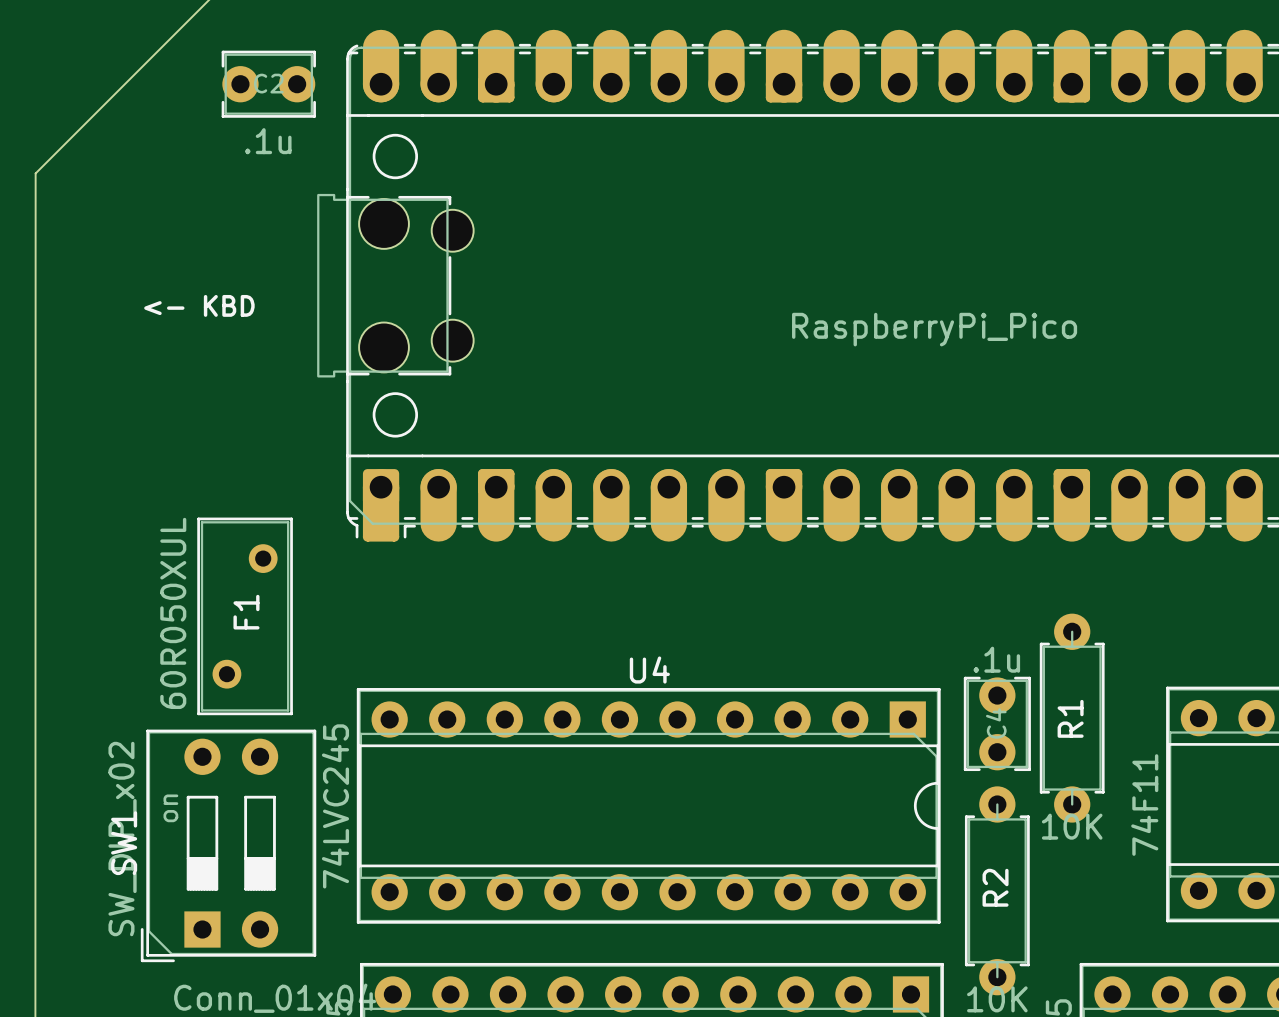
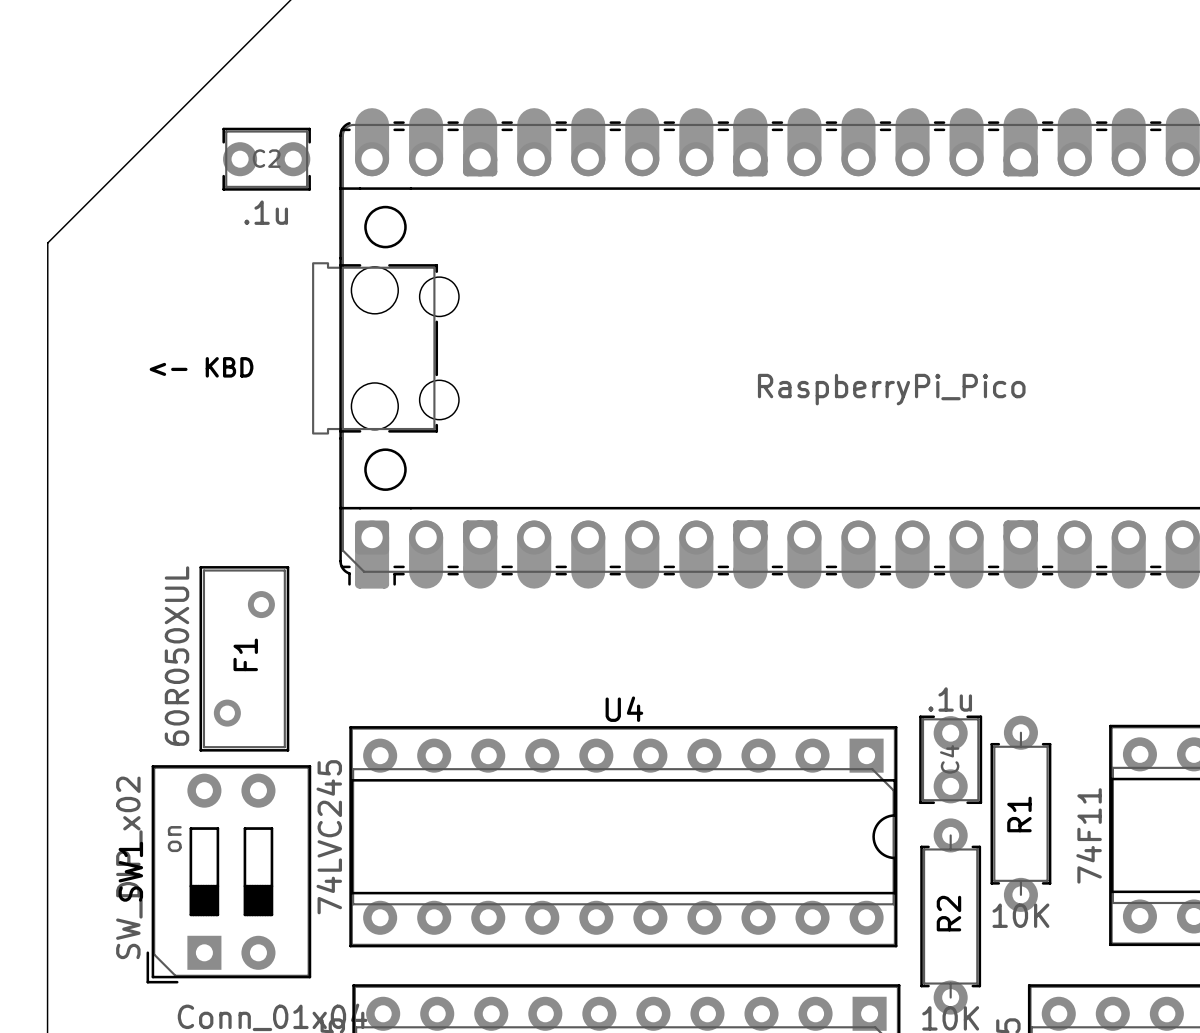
R1 position: (1072, 718) -> (1020, 813)

